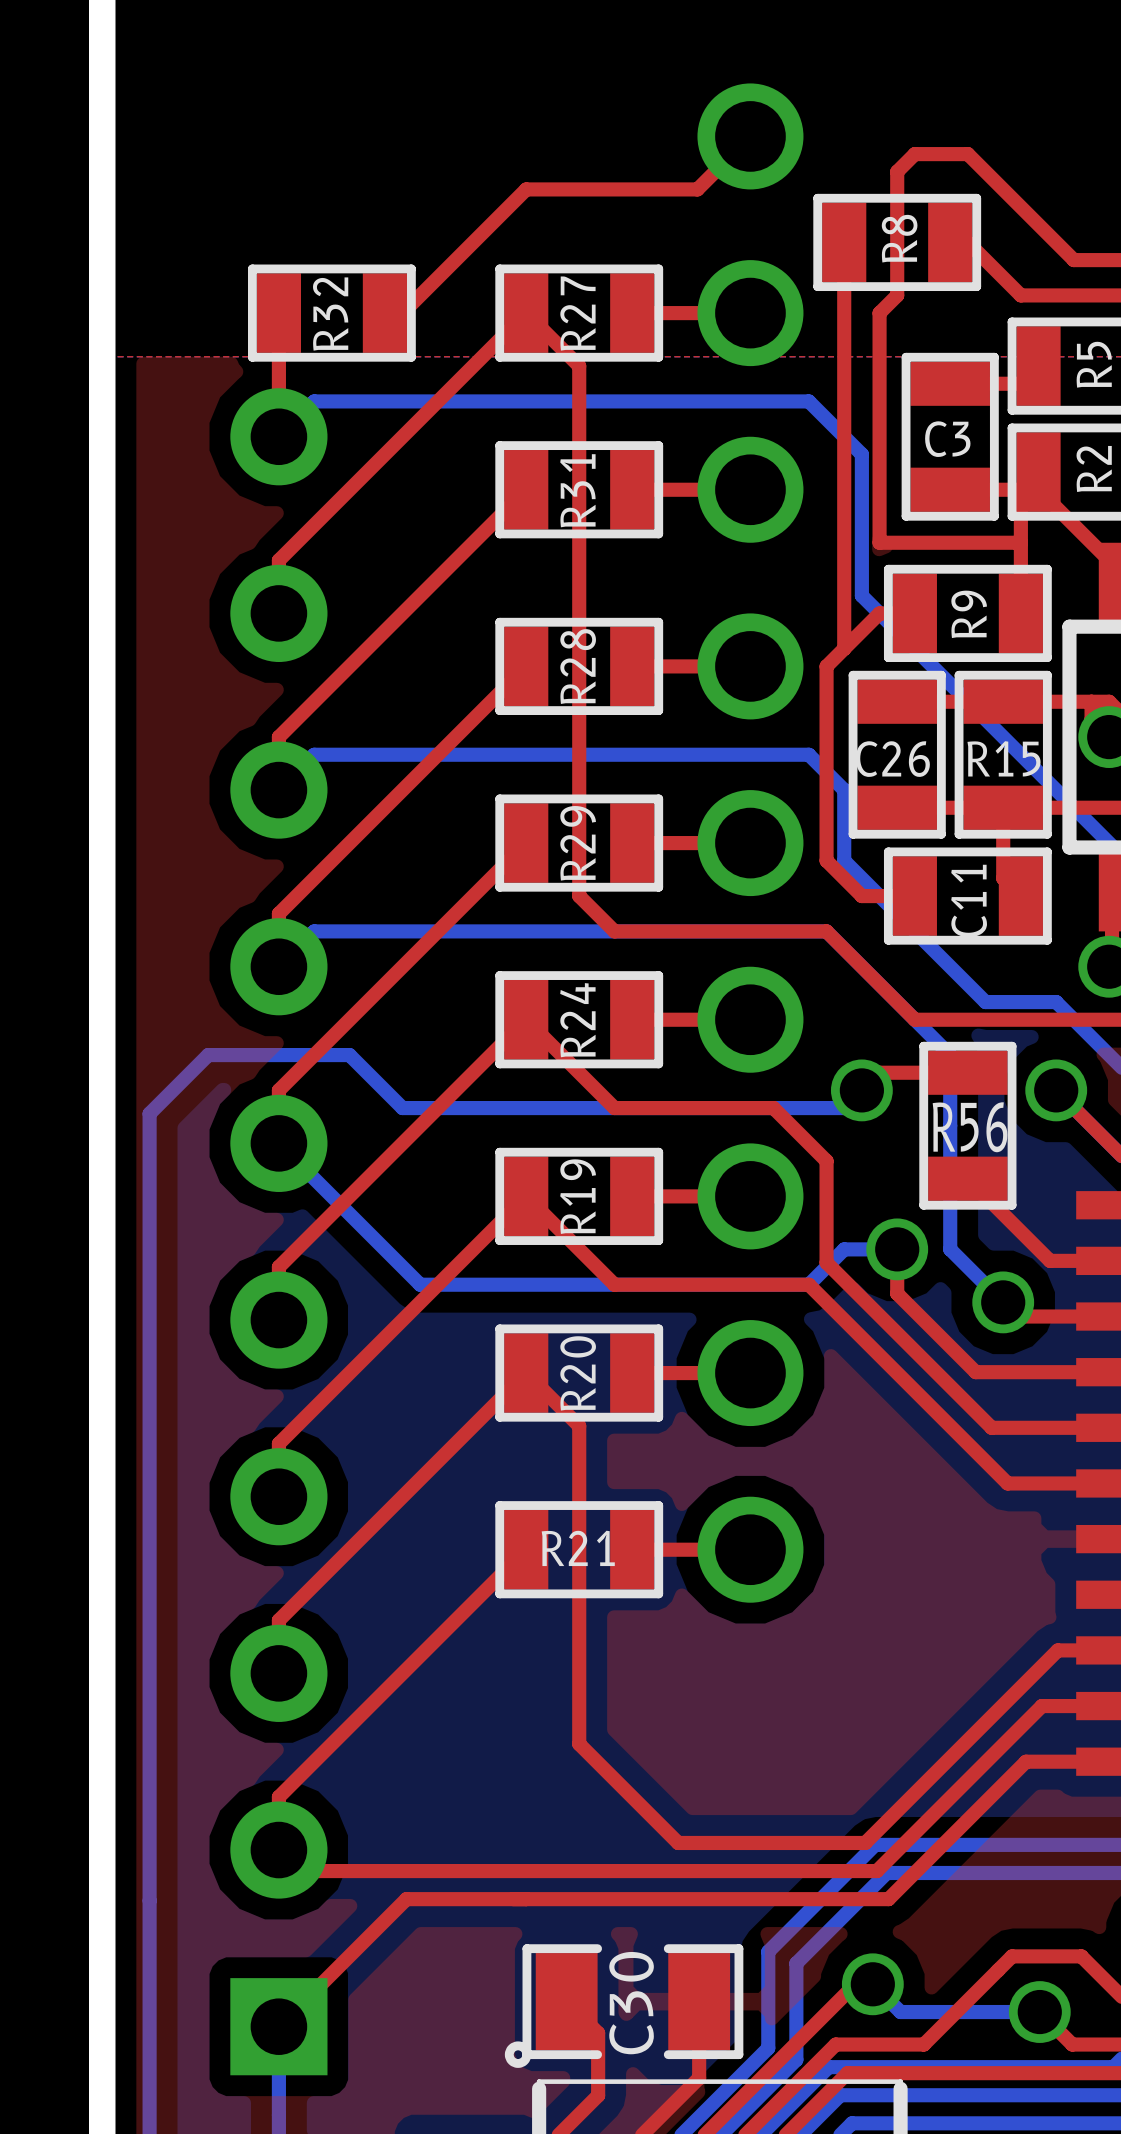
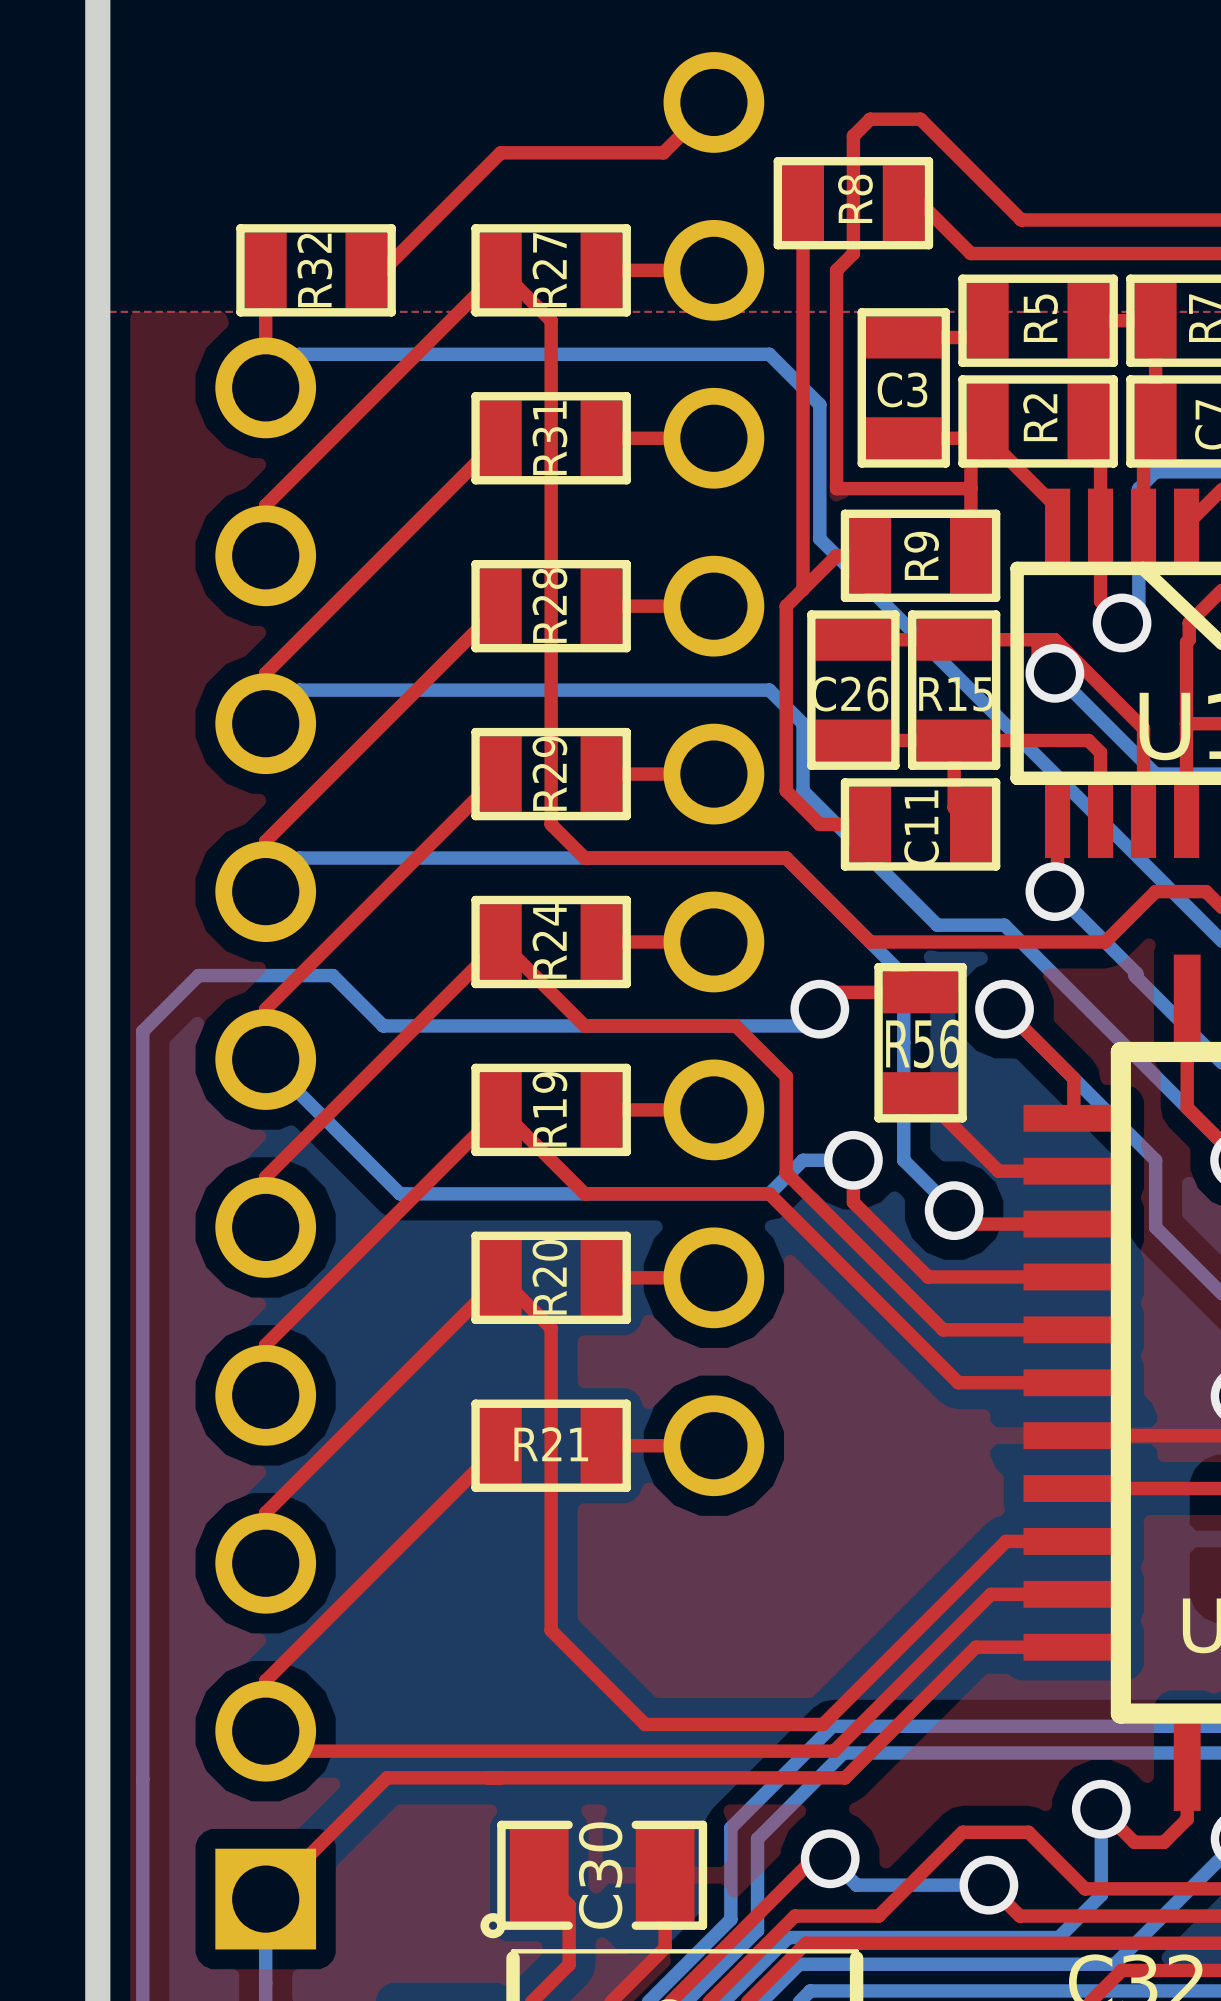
part footprint: [230, 388, 328, 2076] -> [215, 337, 317, 1950]

